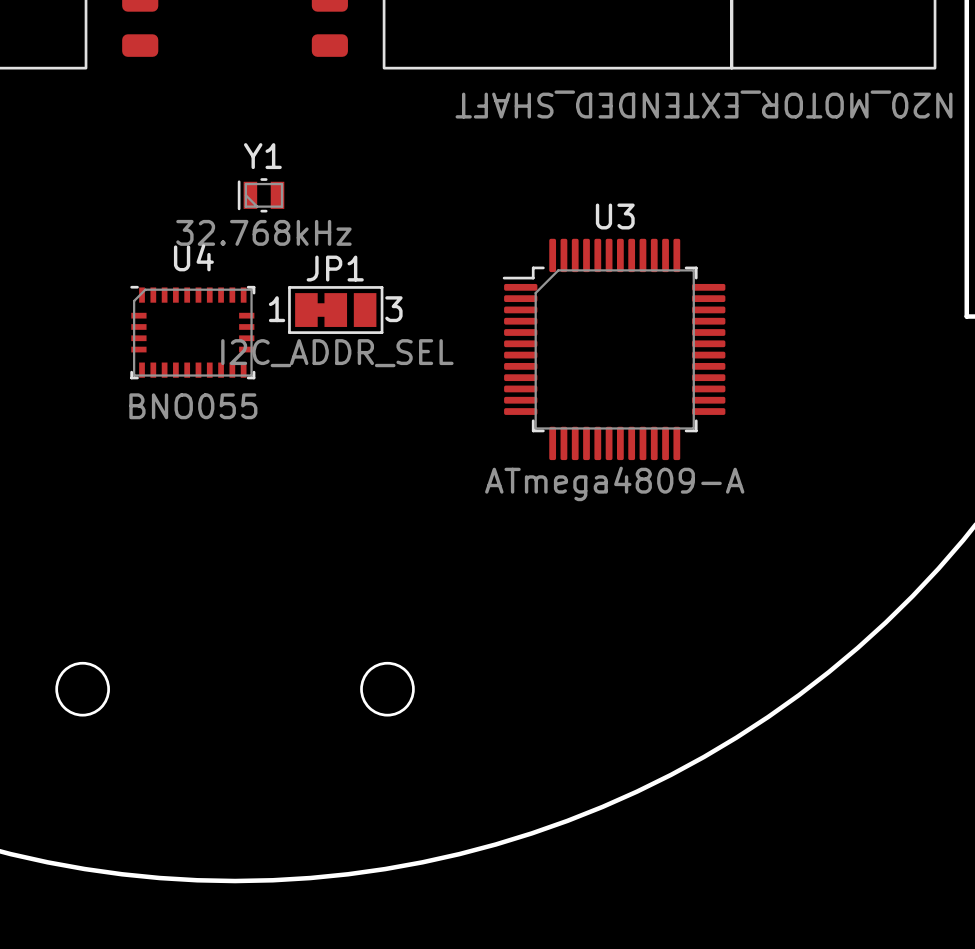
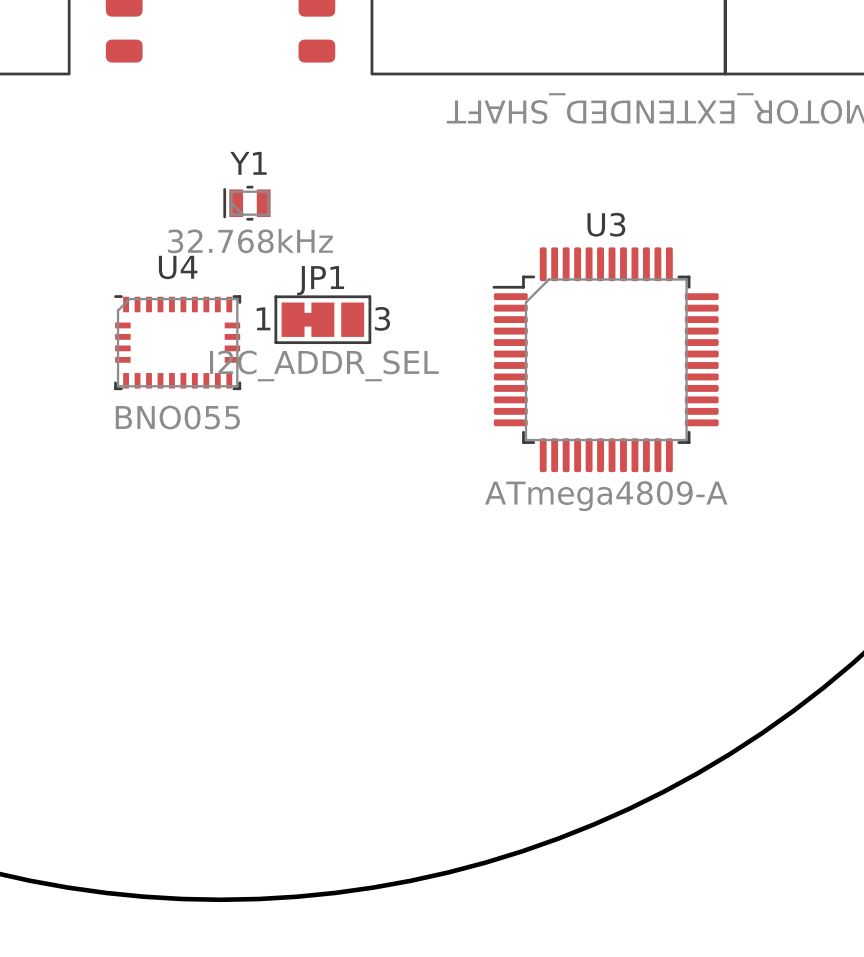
drawing: [55, 661, 415, 717] -> none

